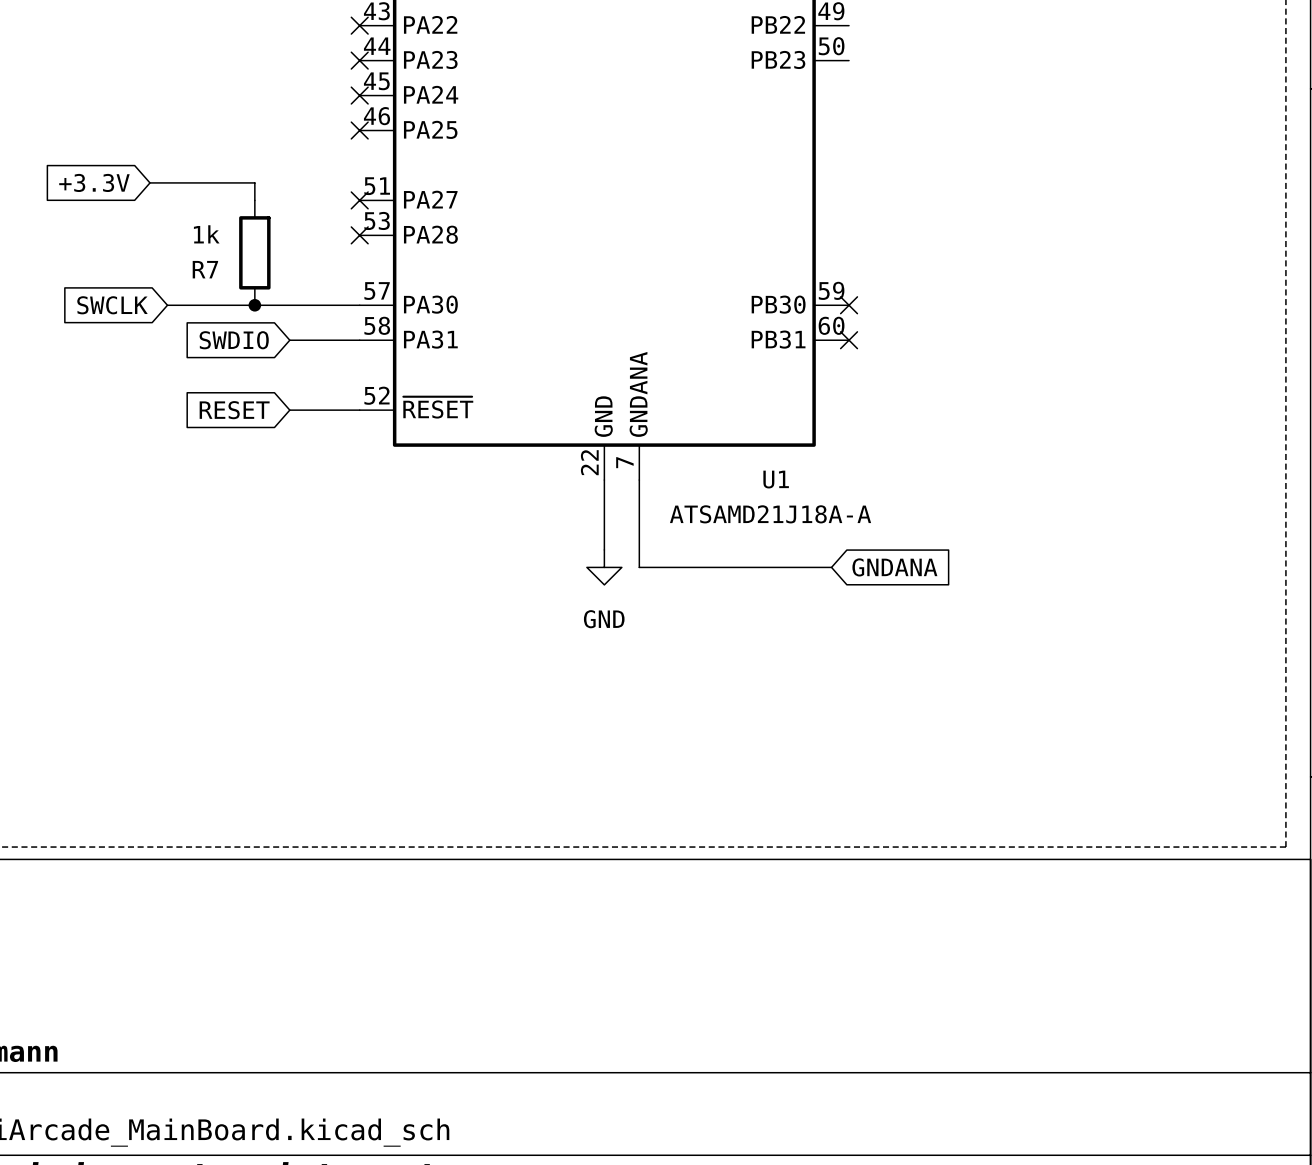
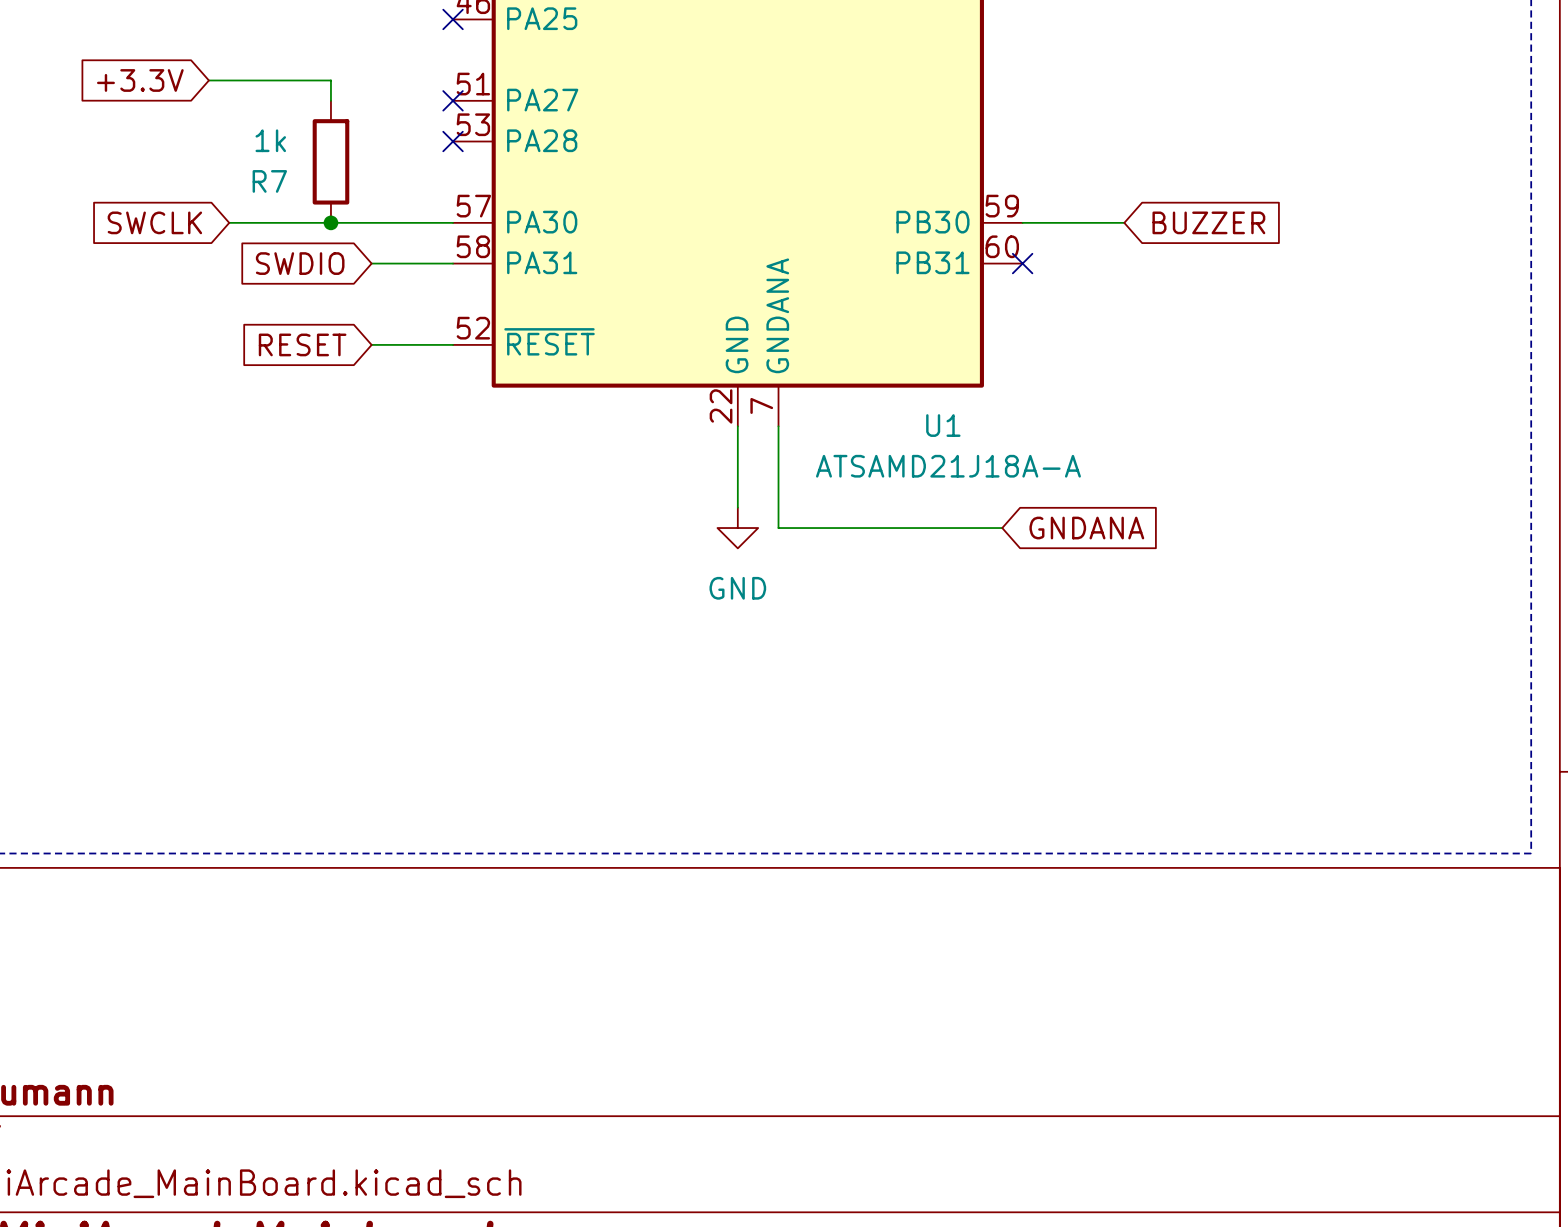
wire: none -> (1022, 222) (1124, 222)
no-connect mark: (849, 305) -> none
global label: none -> BUZZER (1208, 222)

